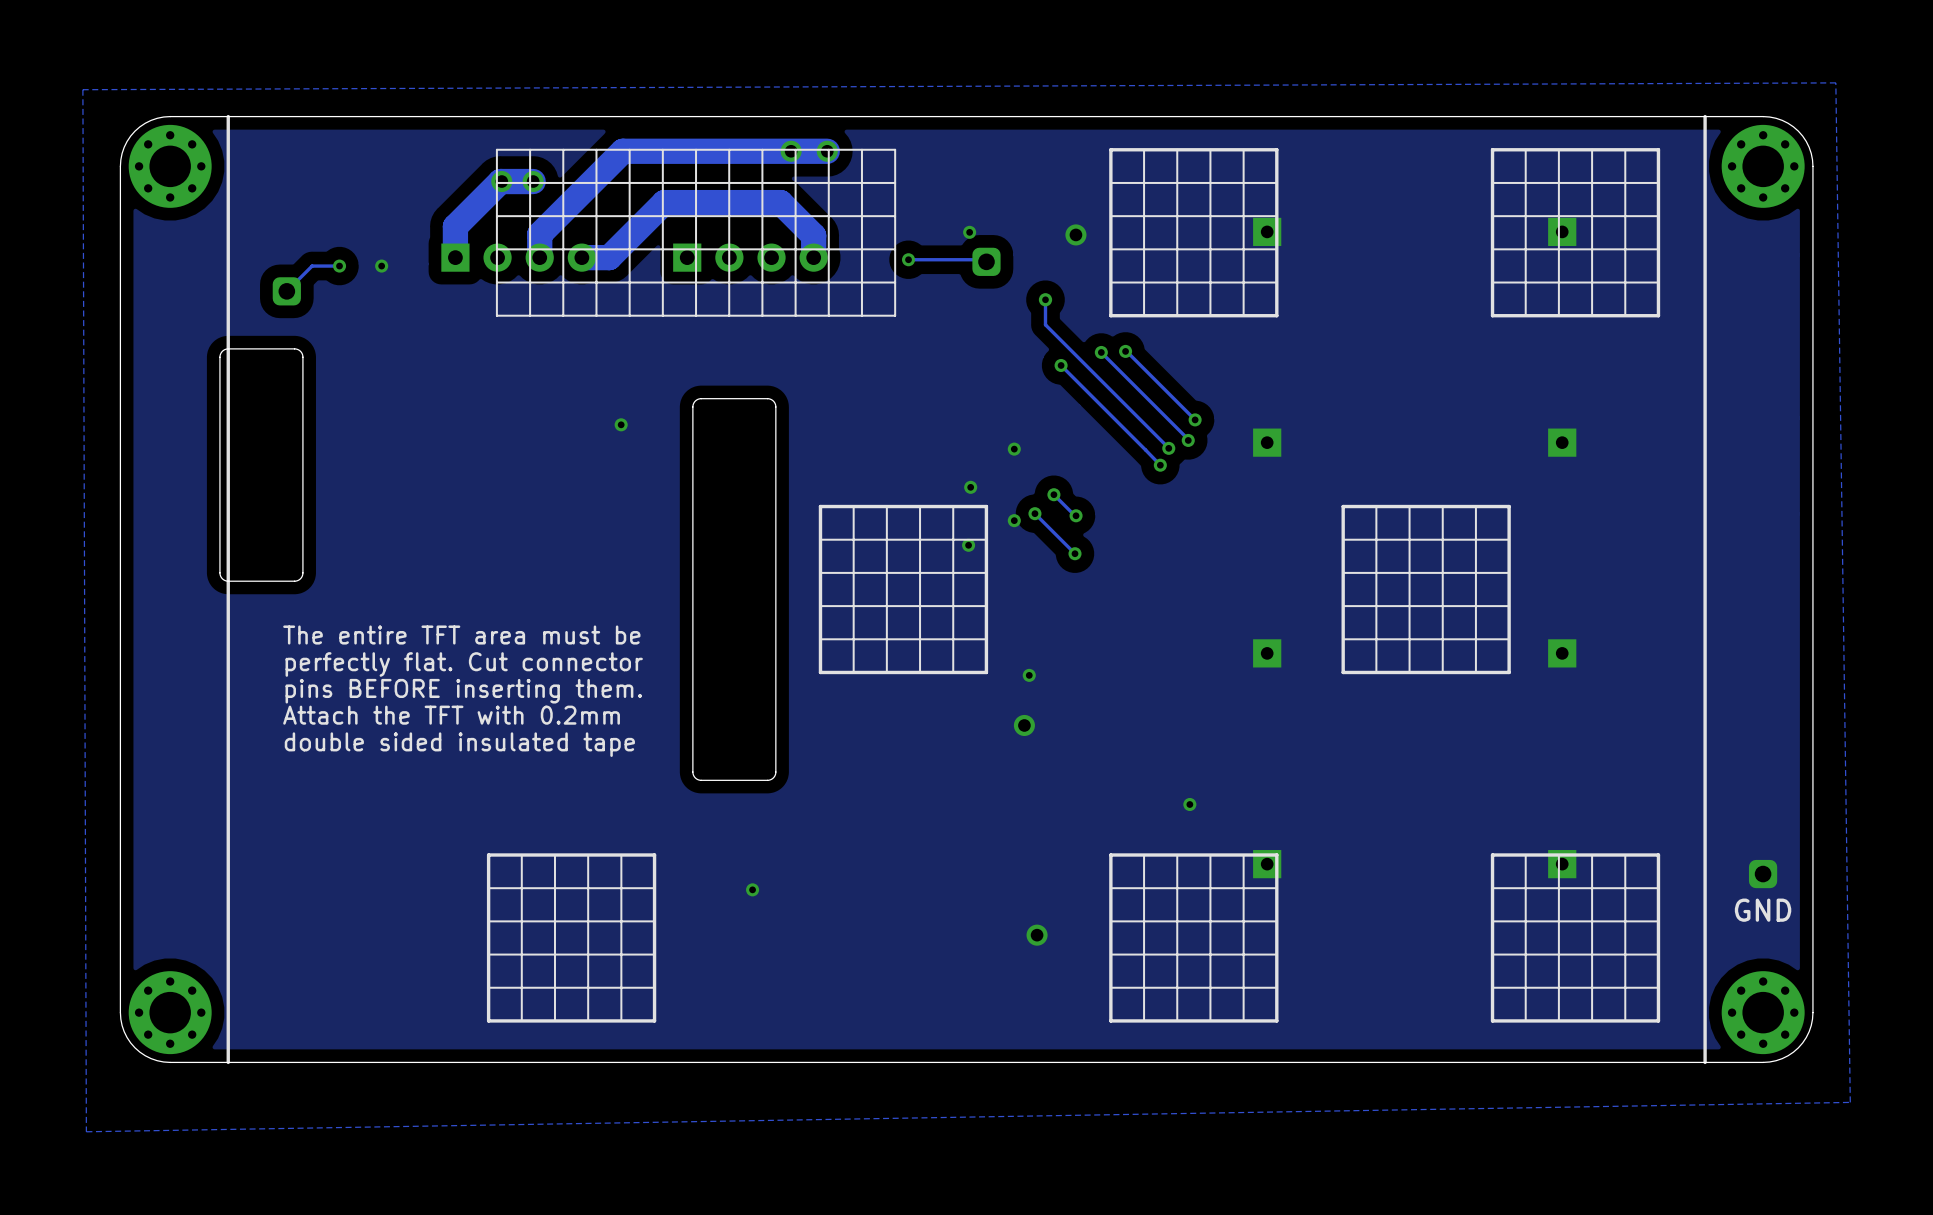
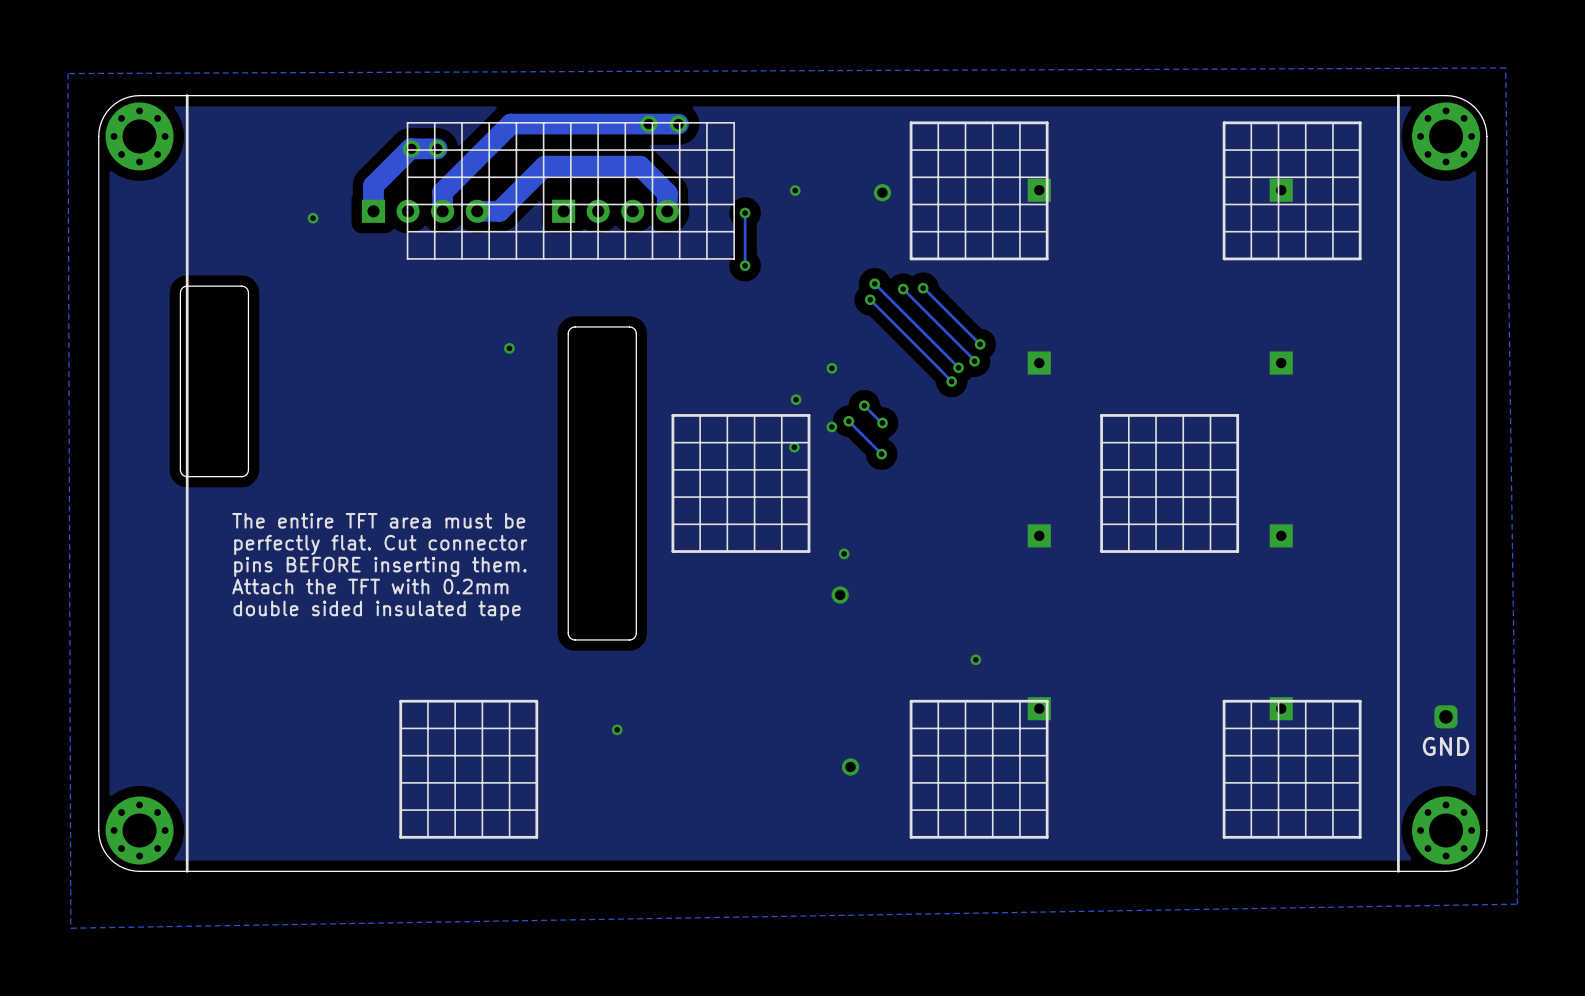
track: (908, 259) (984, 259) (986, 261) -> (745, 213) (745, 265)
part: (986, 261) -> none
track: (339, 266) (312, 266) (286, 291) -> none
via: (339, 266) -> none
part: (286, 291) -> none
track: (1045, 299) (1045, 324) (1066, 346) -> none
via position: (1045, 299) -> (874, 283)
via: none -> (745, 265)

